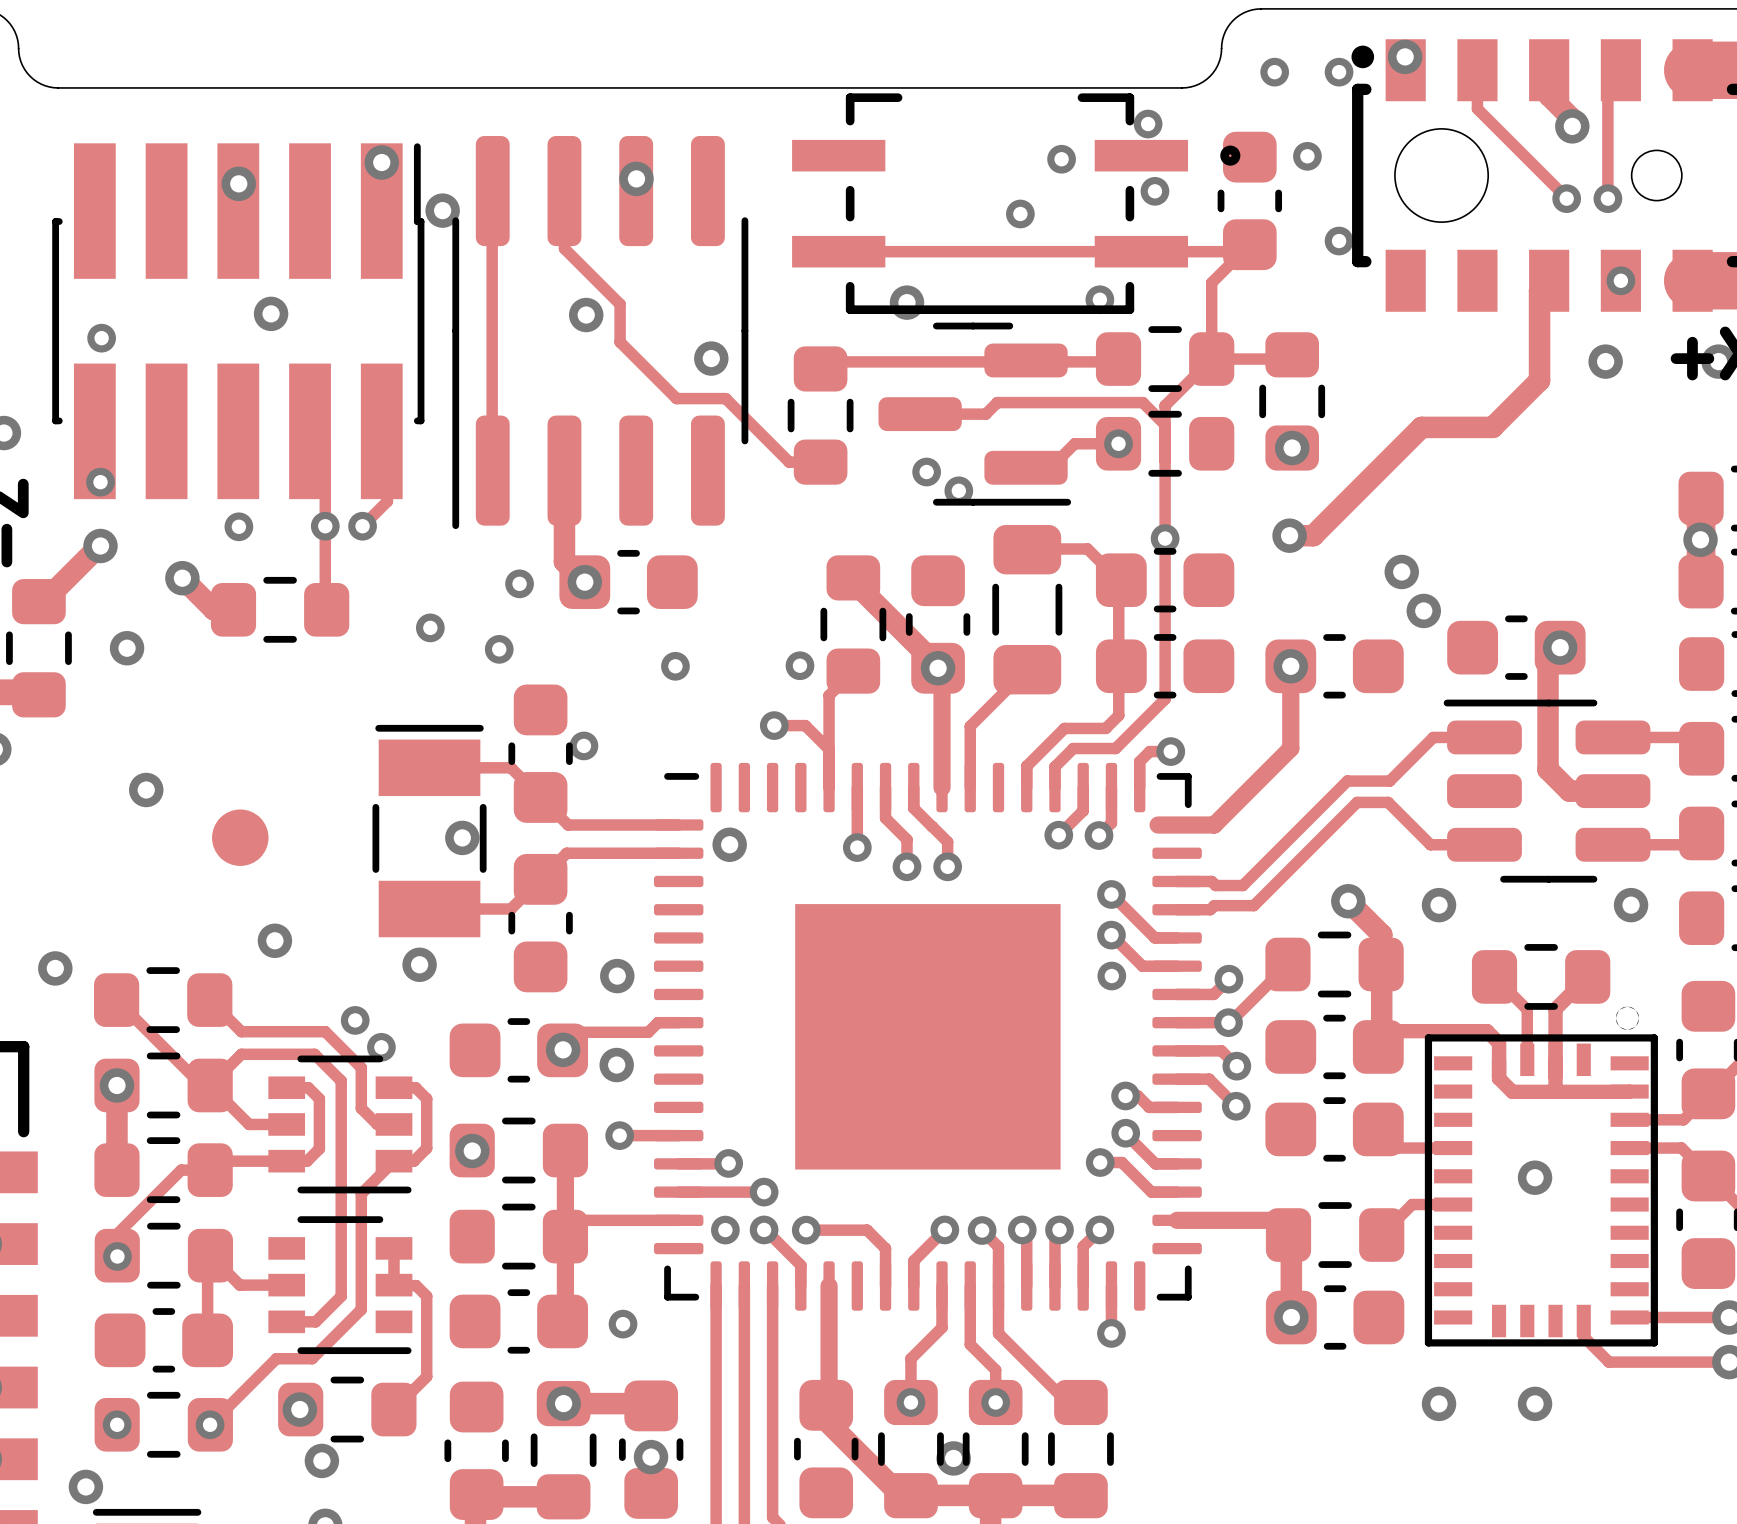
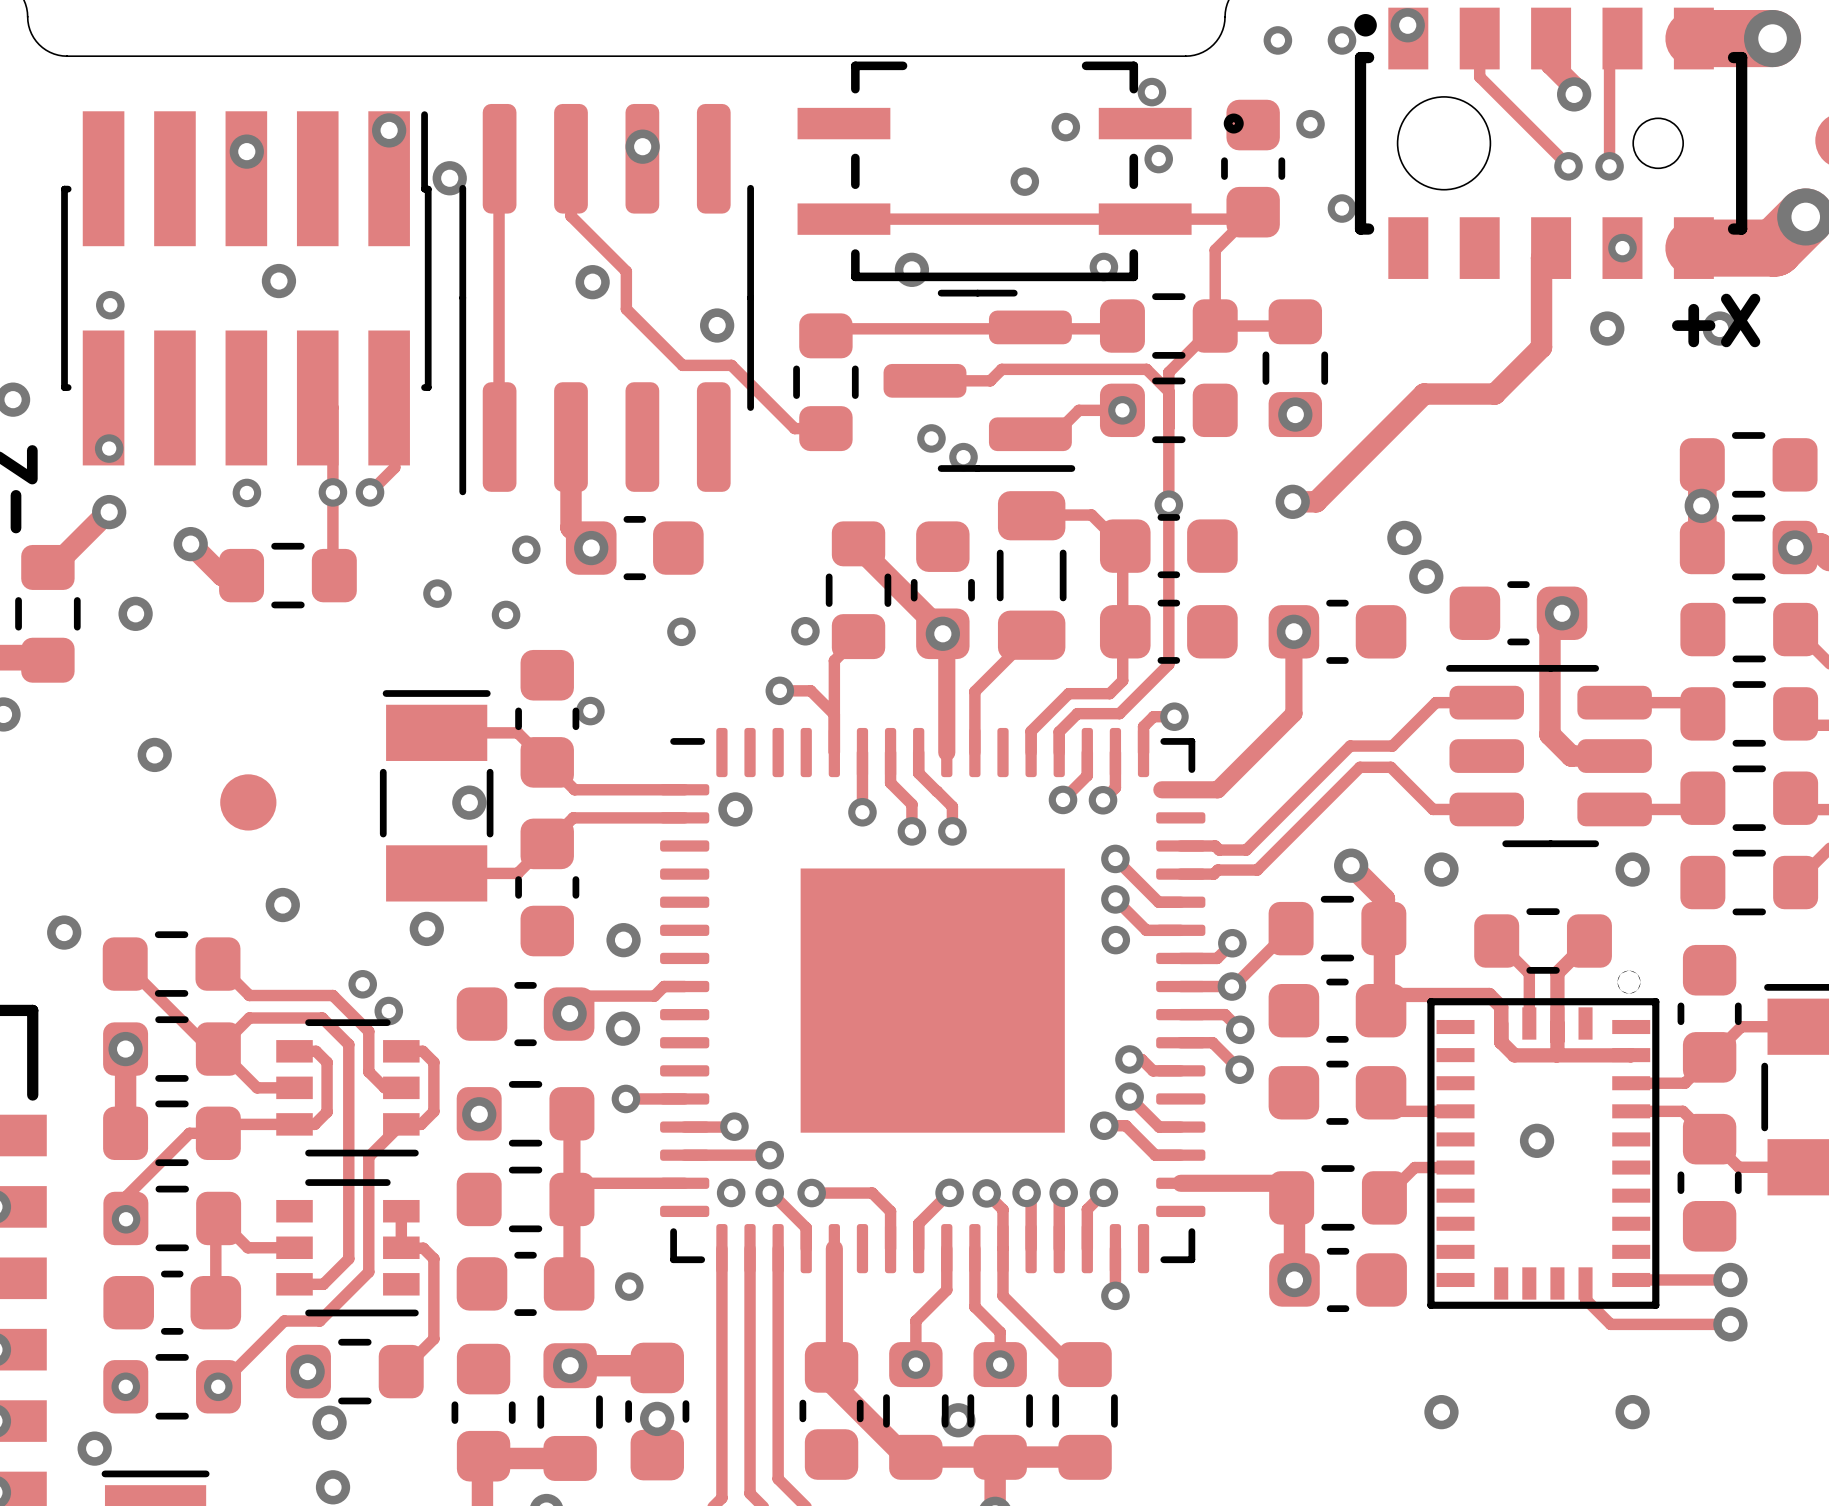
via position: (1439, 1403) -> (1441, 1412)
via: (1535, 1403) -> none
via: none -> (1632, 1412)

